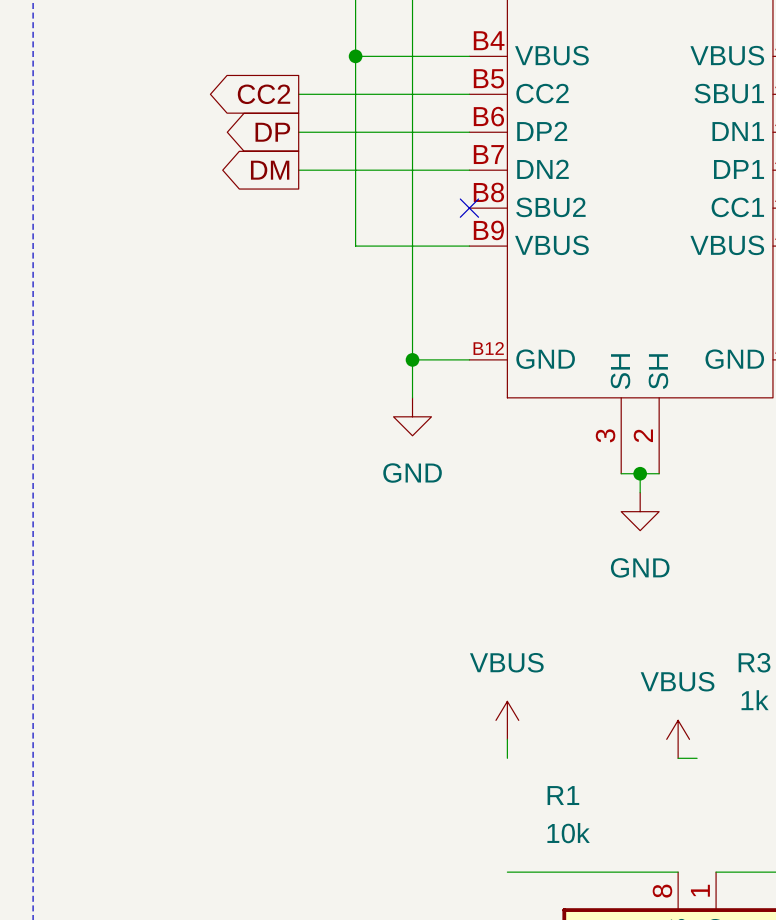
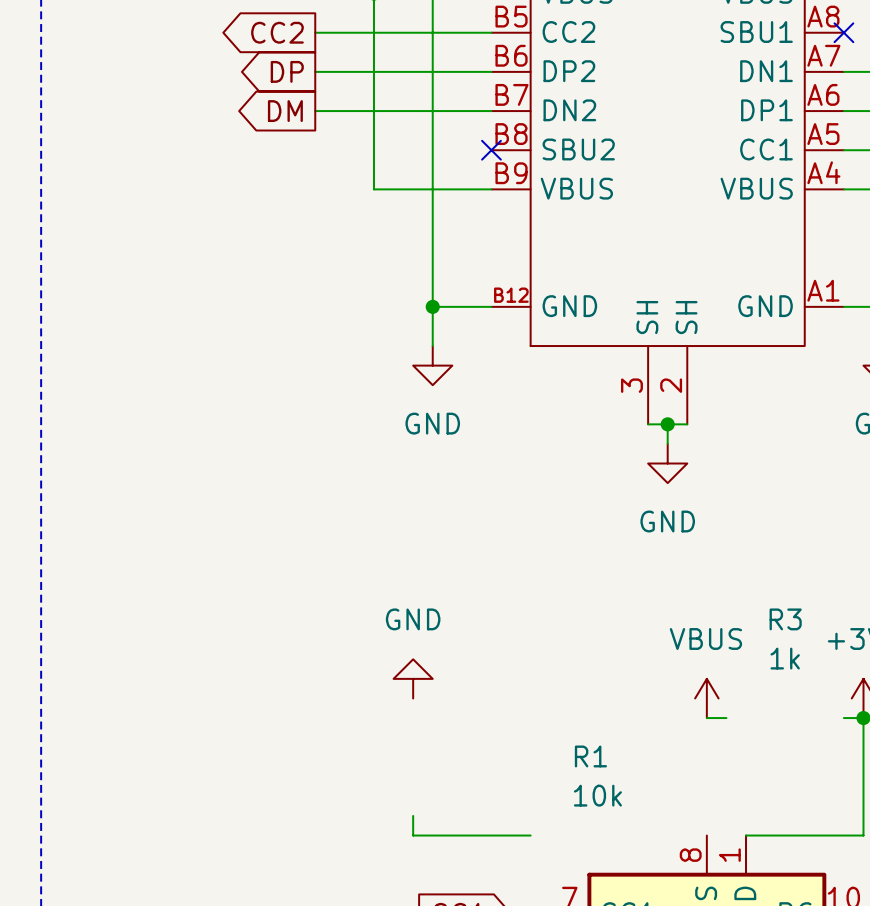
power symbol: none -> GND (413, 678)
power symbol: VBUS (507, 720) -> none
wire: (507, 739) (507, 758) -> none
wire: (507, 872) (678, 872) -> (530, 835) (413, 835) (413, 815)

